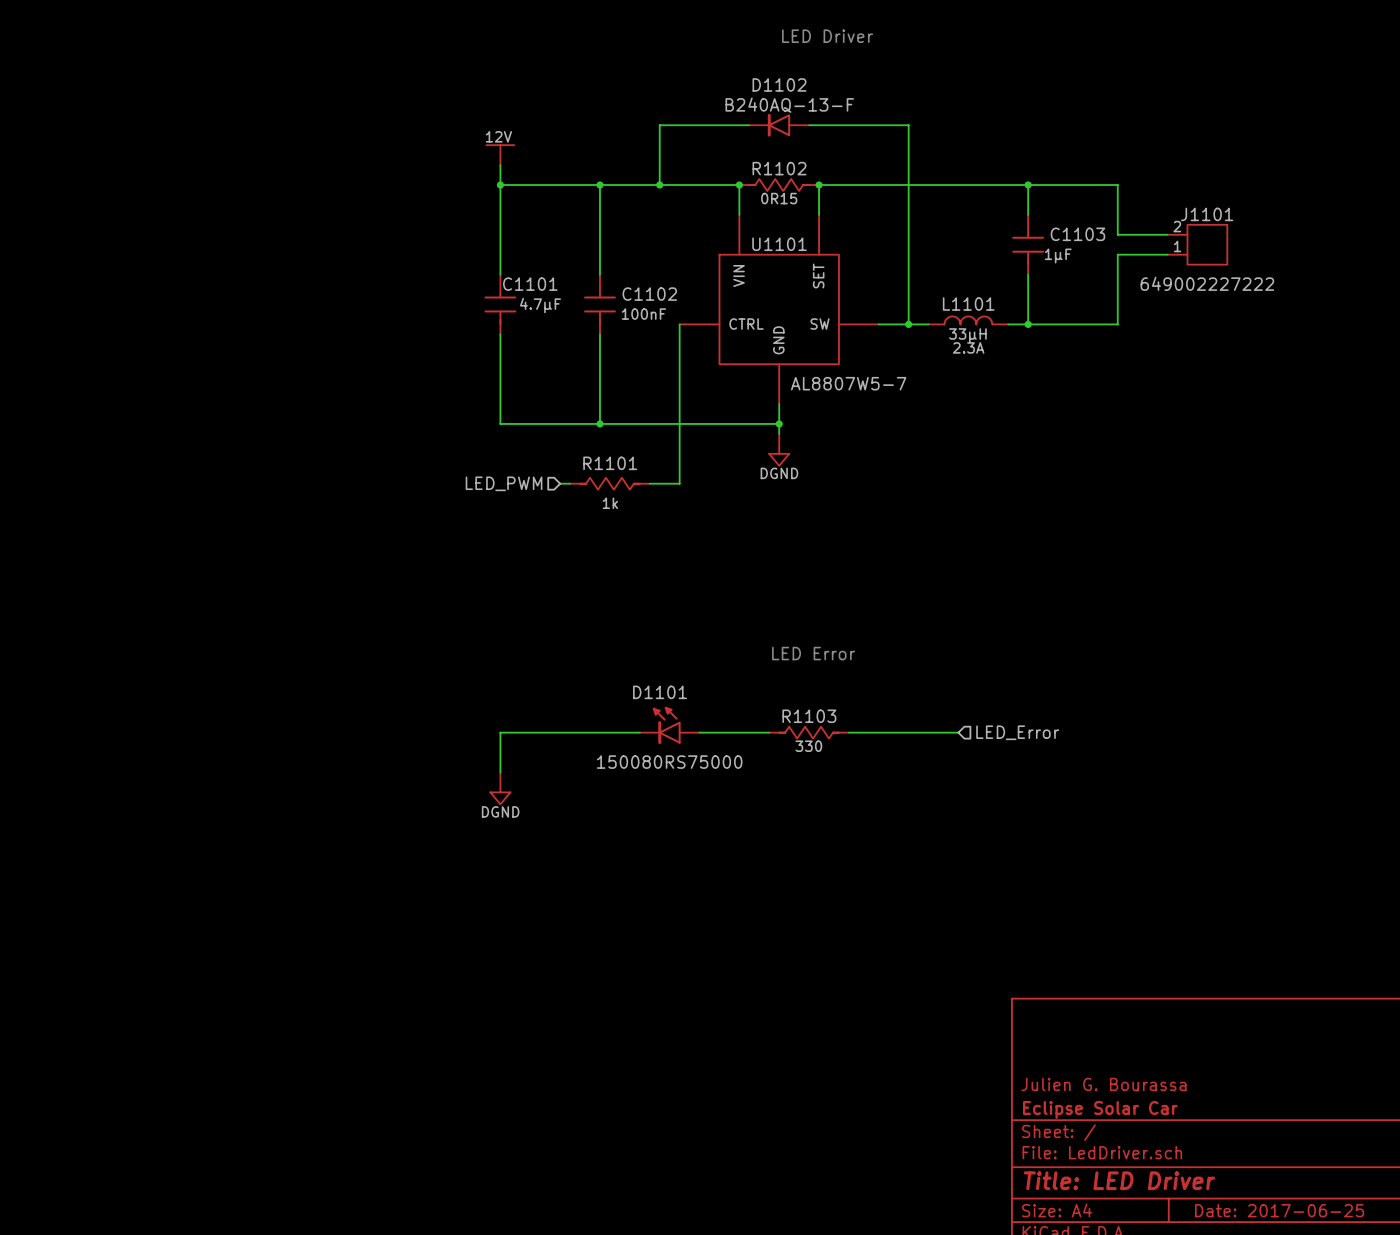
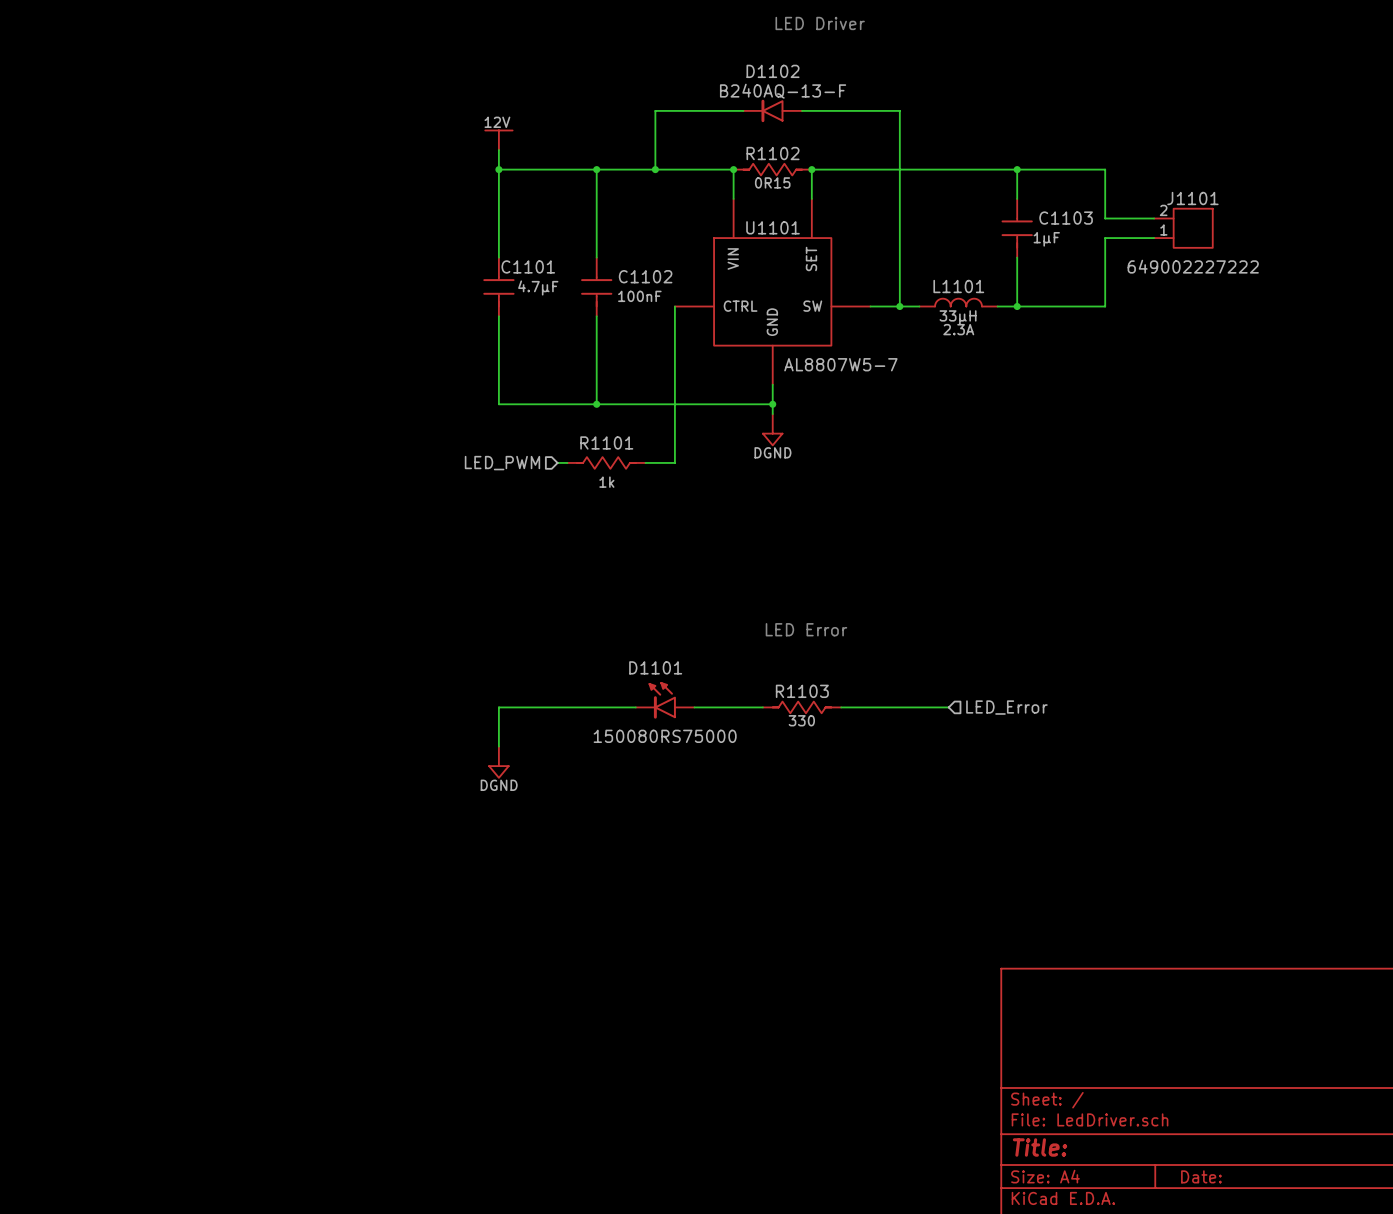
title block: Julien G. Bourassa (1104, 1084) -> none
title block: Eclipse Solar Car (1100, 1109) -> none
title block: Title: LED Driver (1119, 1180) -> Title: (1040, 1147)
title block: Date: 2017-06-25 (1279, 1210) -> Date: (1201, 1176)

